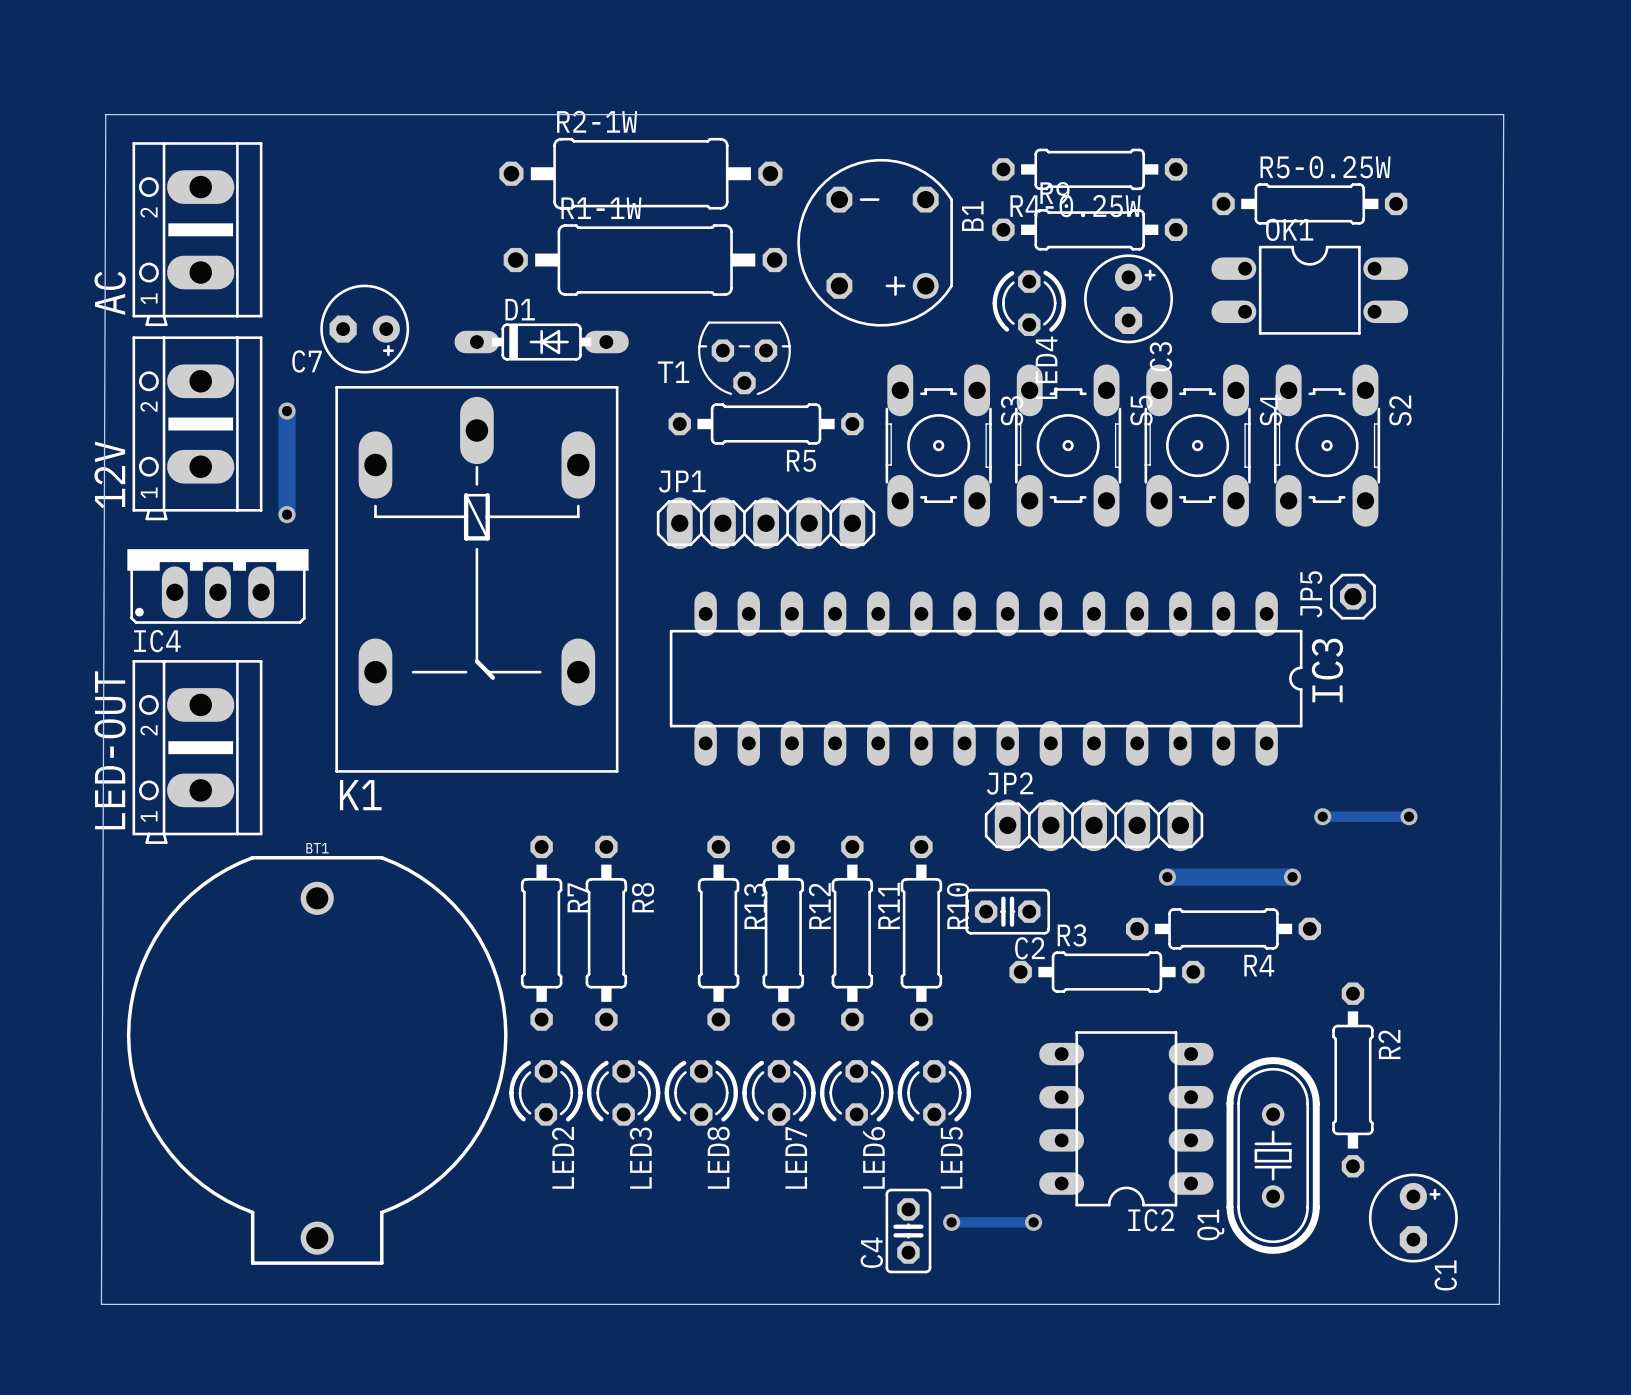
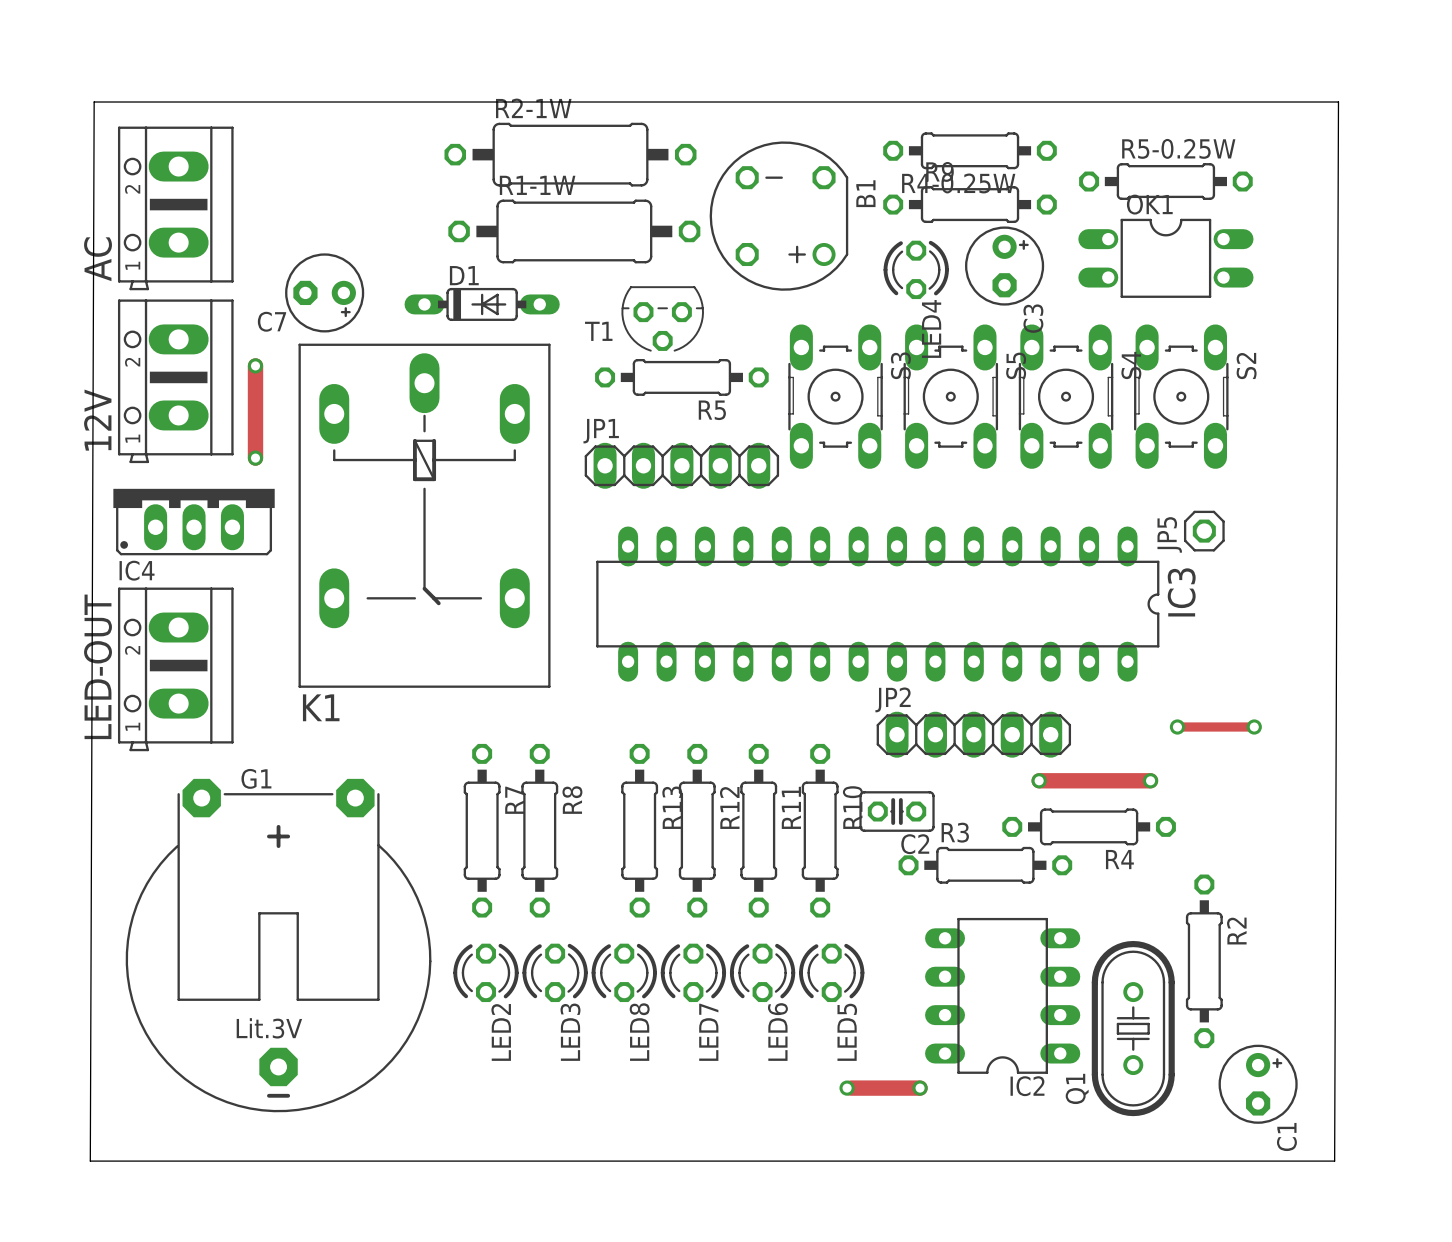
BT1: (317, 1060) -> none
G1: none -> (278, 945)
track width: thin (955, 1222) (1033, 1222) -> thick (850, 1088) (920, 1088)
C4: (908, 1231) -> none

